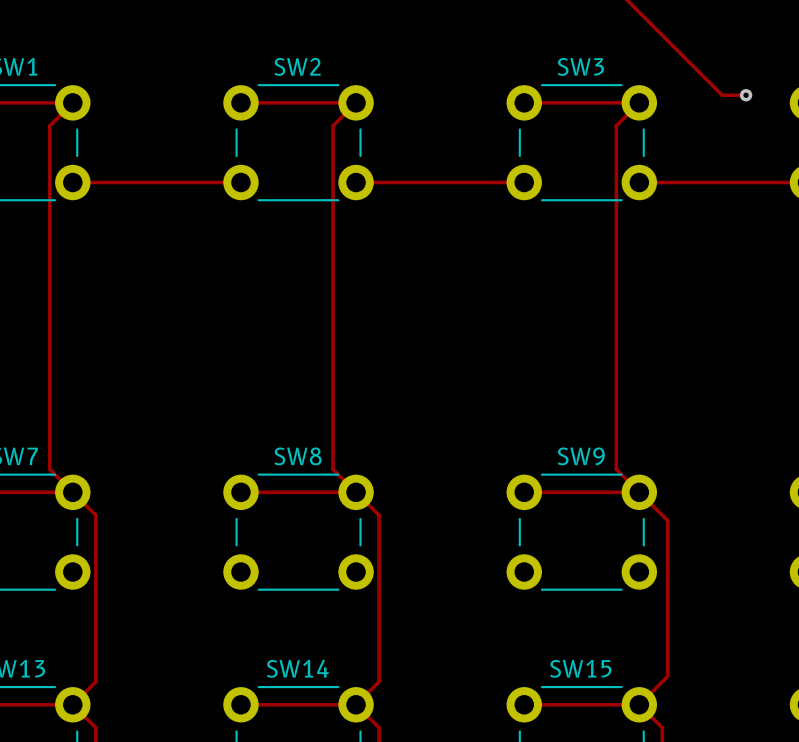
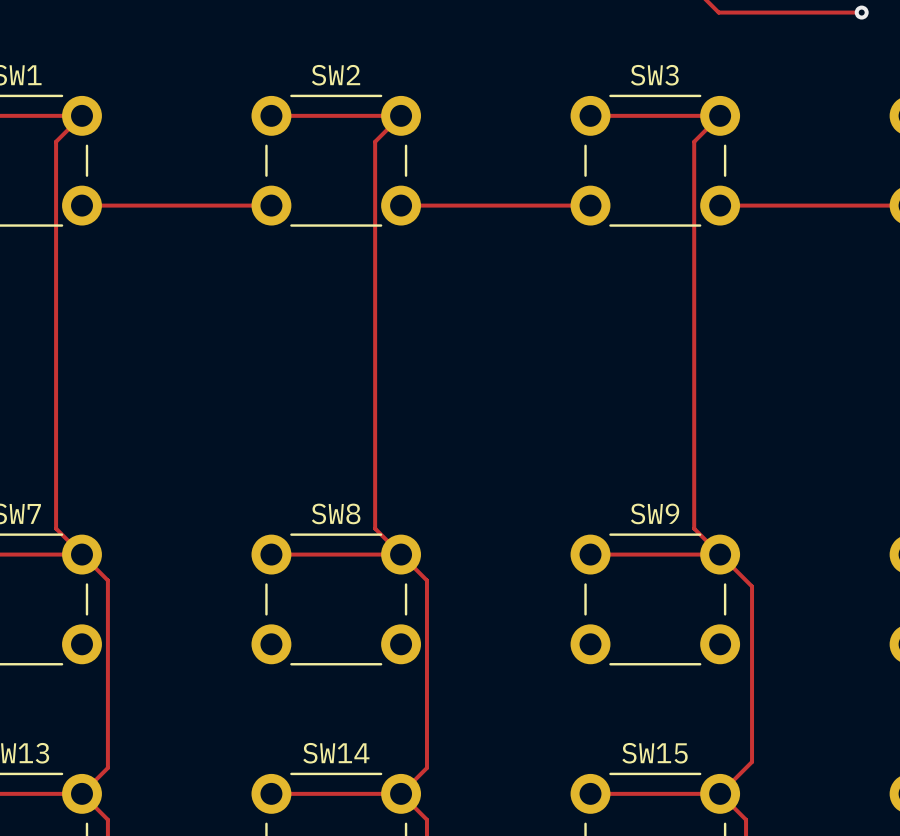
track: (638, 11) (722, 95) (746, 95) -> (718, 12) (861, 12)
via position: (746, 95) -> (861, 12)

